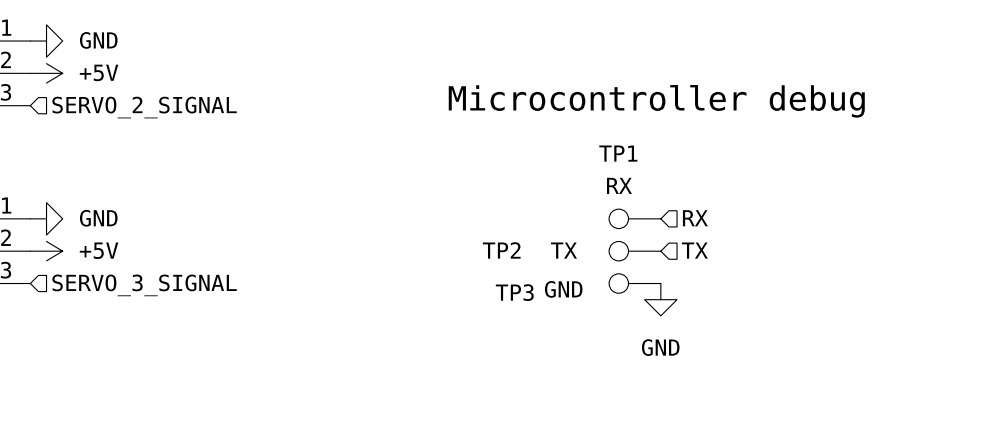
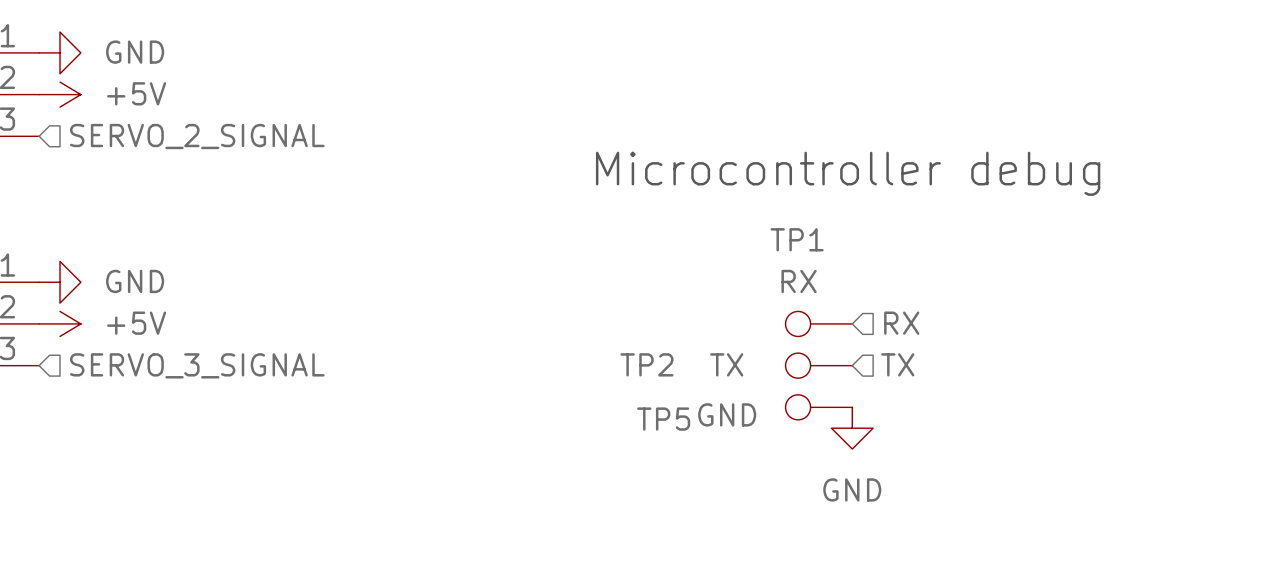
text position: Microcontroller debug (656, 101) -> Microcontroller debug (848, 173)
TP1: RX (634, 218) -> none
hierarchical label: RX (695, 218) -> none
TP2 name: TP2 (501, 250) -> TP1 (797, 239)
TP2 value: TX (564, 250) -> RX (799, 281)
hierarchical label: TX (694, 250) -> RX (901, 323)
hierarchical label: none -> TX (897, 364)
TP3 value: GND (563, 289) -> TX (726, 364)
TP3 name: TP3 (514, 292) -> TP2 (646, 364)
power symbol position: GND (660, 299) -> GND (852, 428)
TP5: none -> GND (818, 407)

